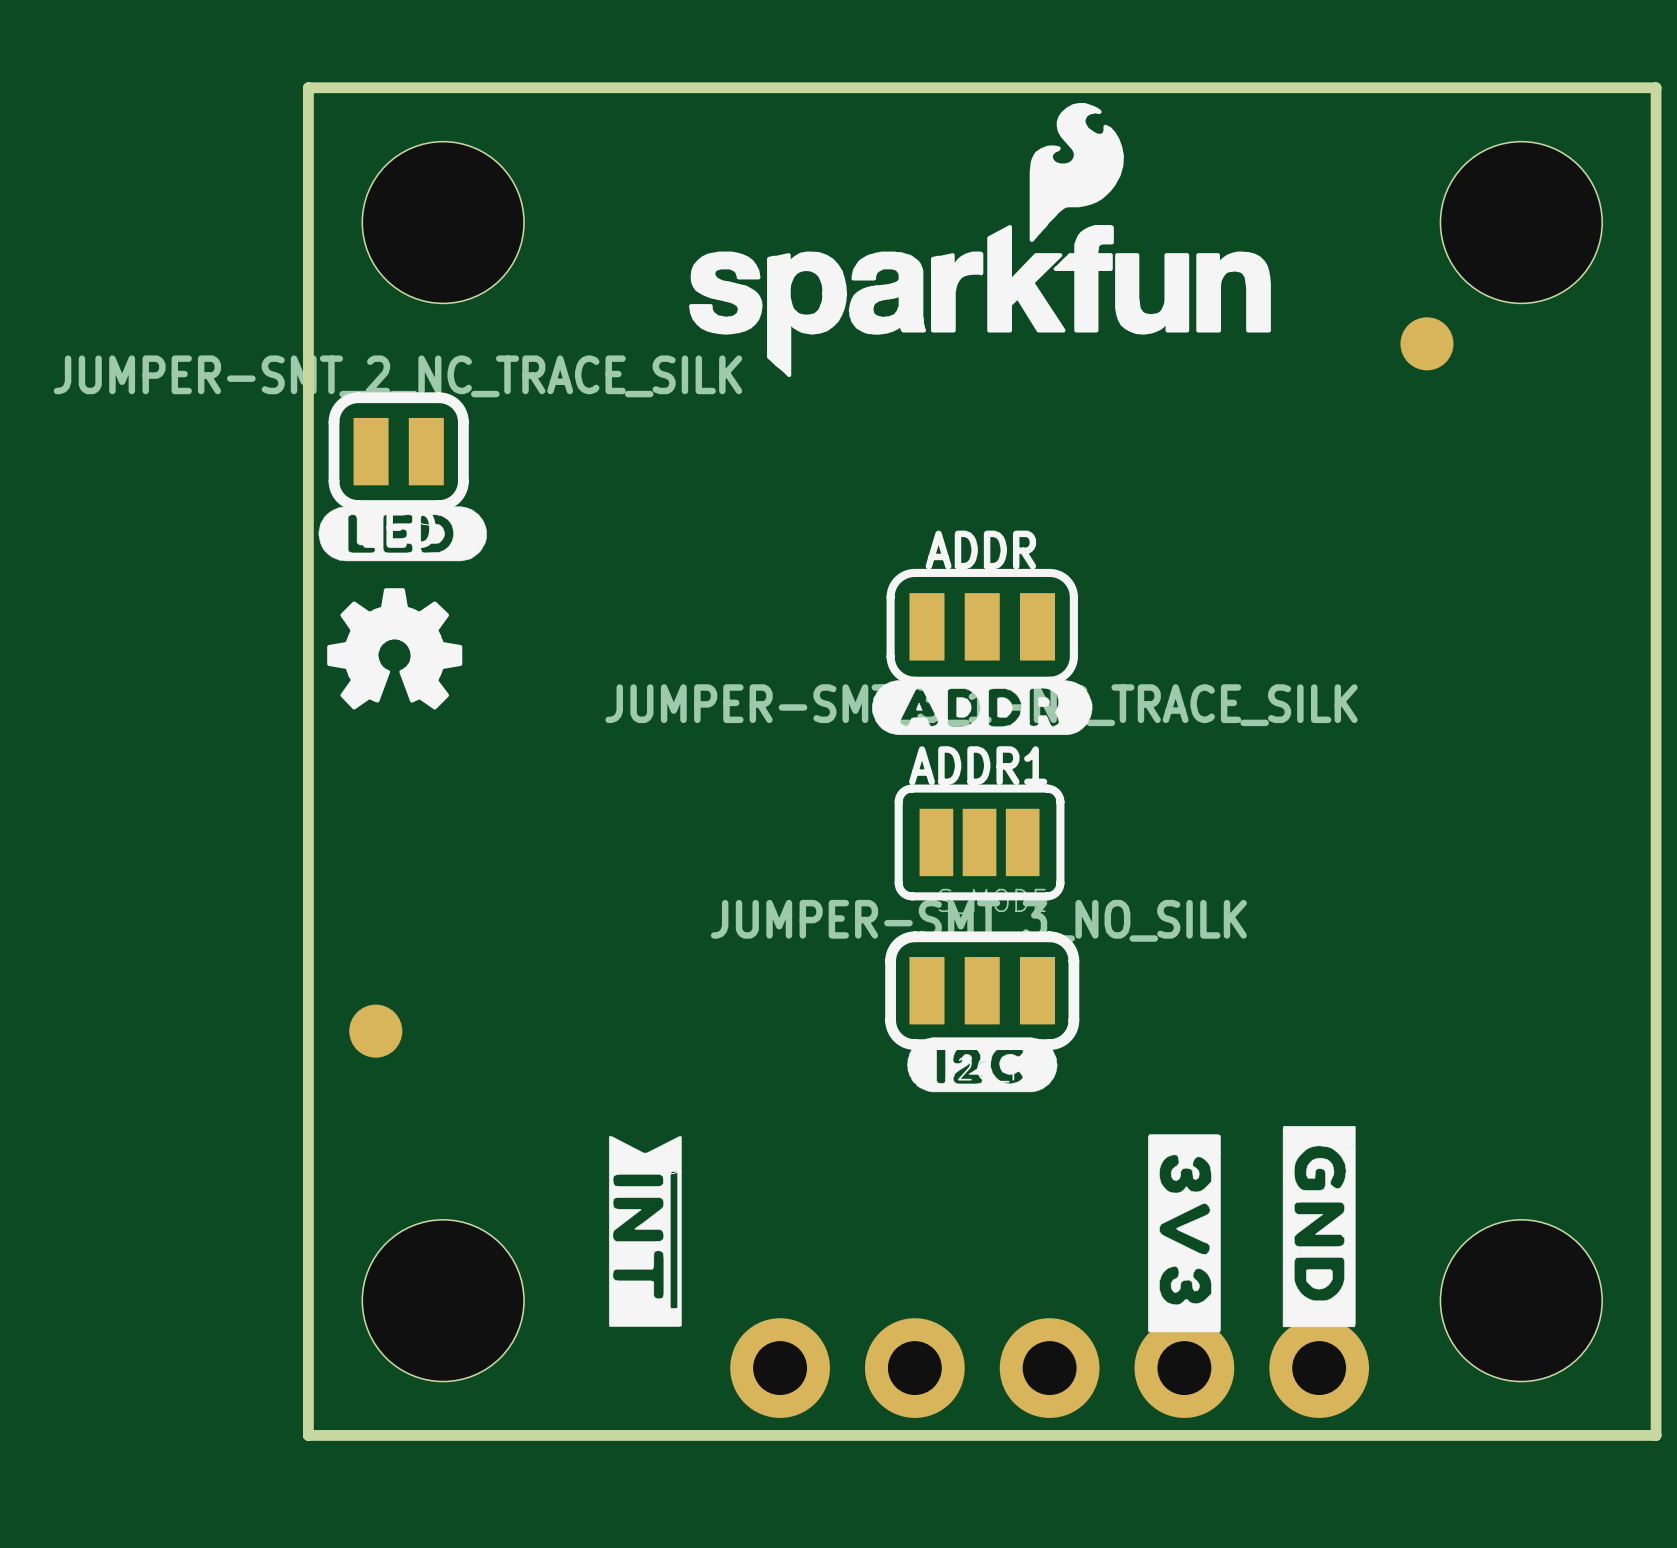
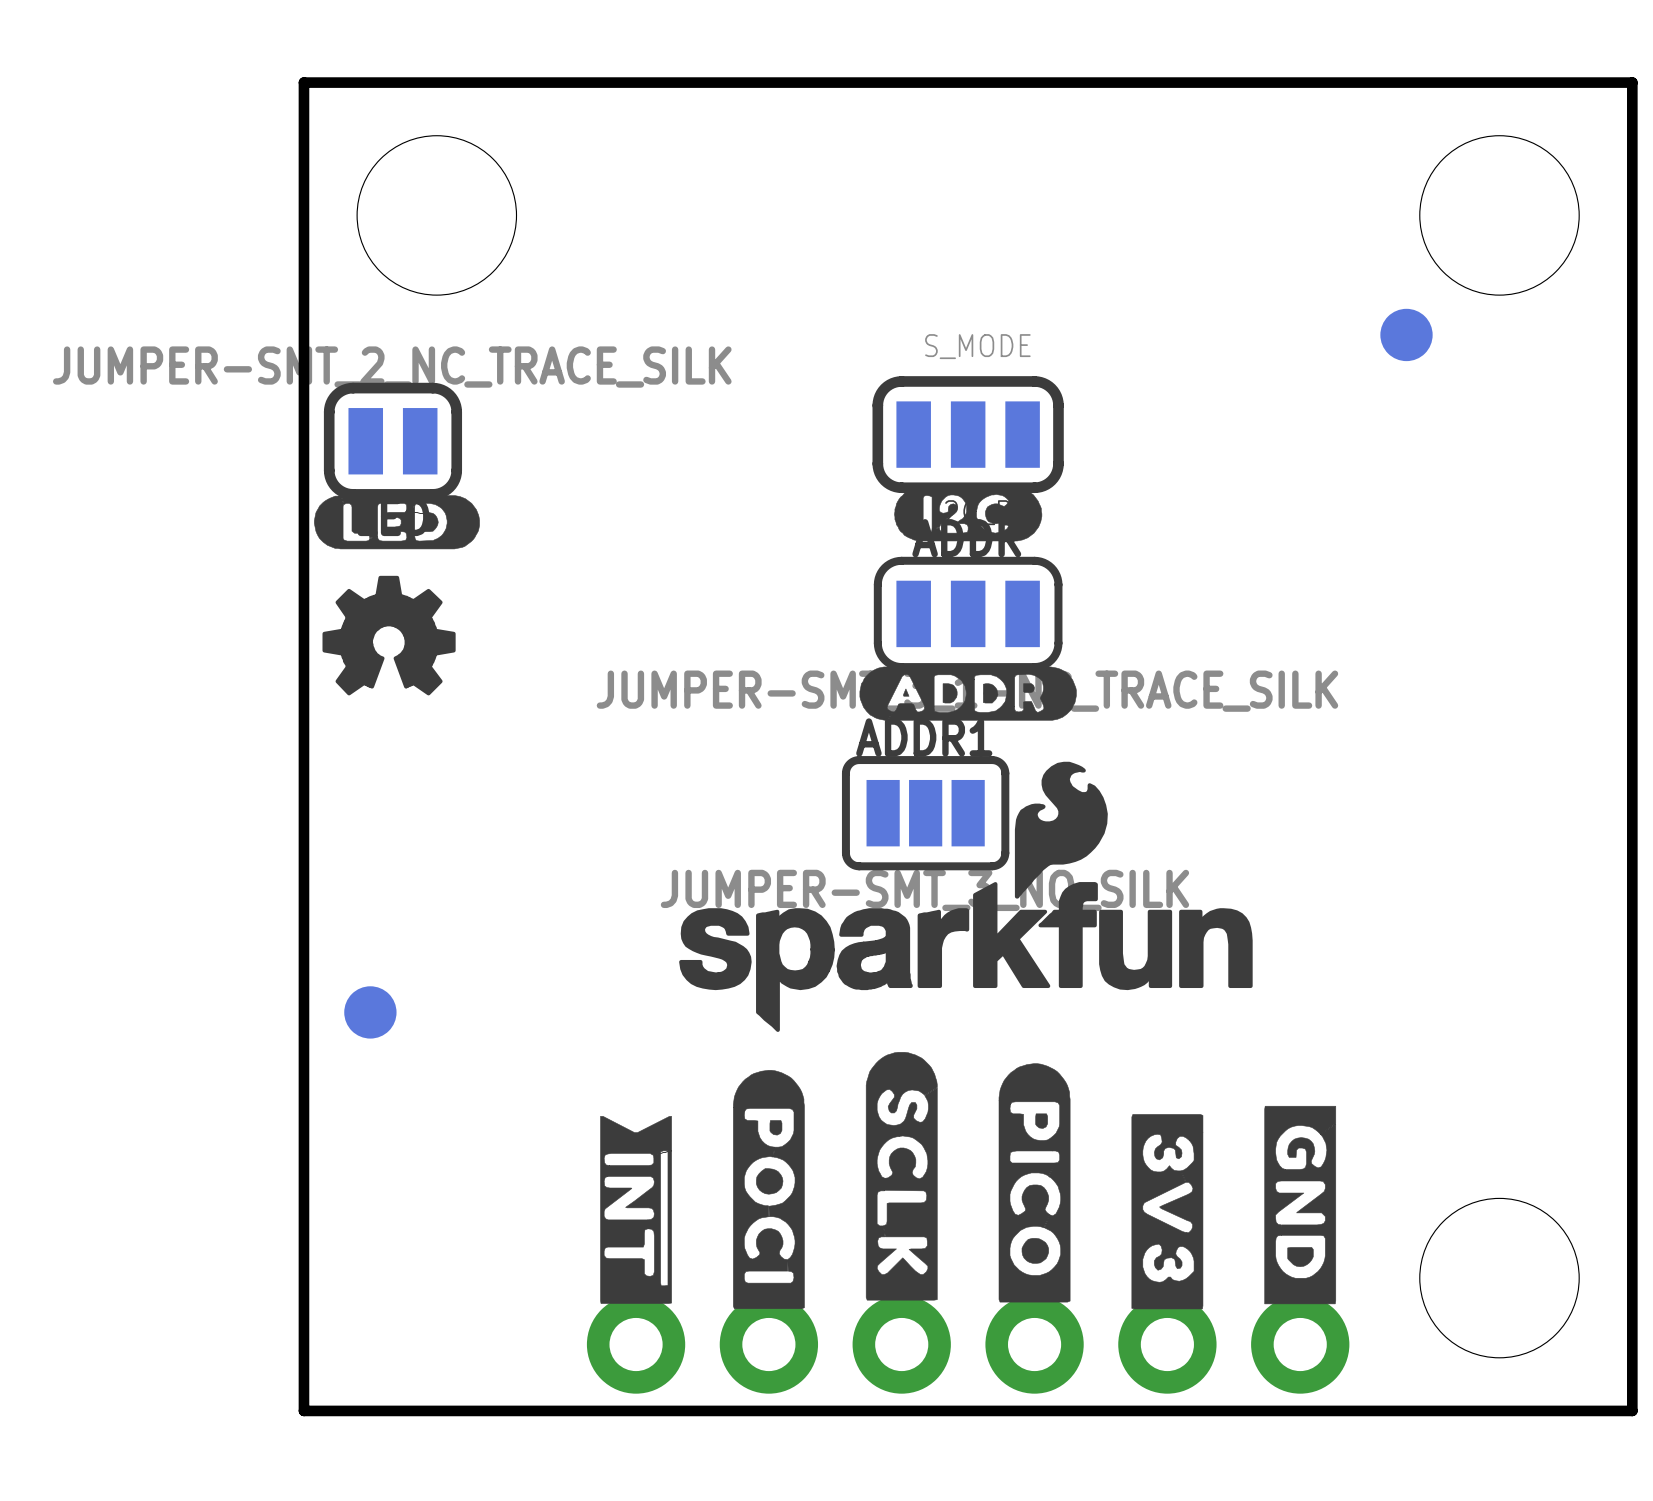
drawing position: (979, 240) -> (965, 896)
ADDR1 position: (979, 842) -> (925, 813)
part position: (982, 990) -> (968, 434)
drawing position: (982, 1064) -> (968, 514)
drawing: none -> [733, 1052, 1071, 1310]
part: (443, 1300) -> none
part: none -> (968, 1344)
part: (1049, 1368) -> none

